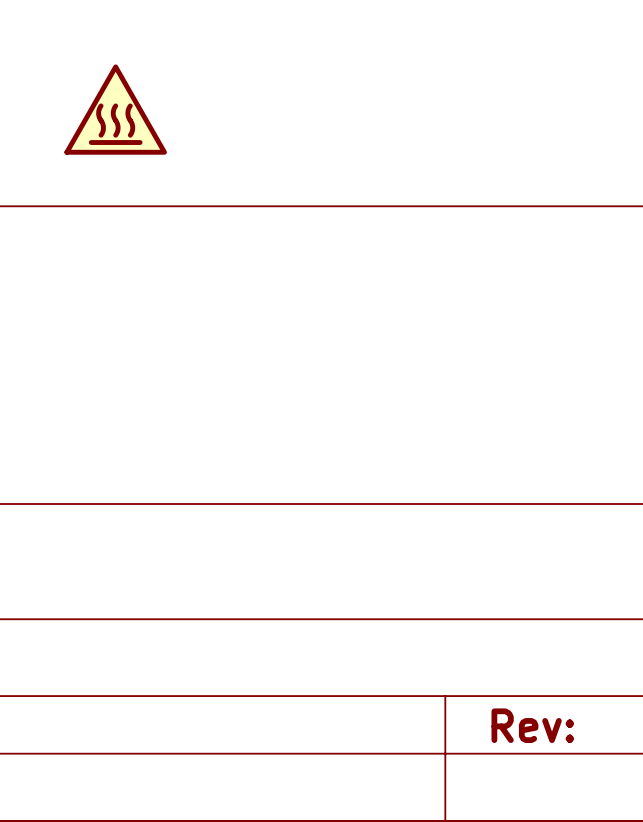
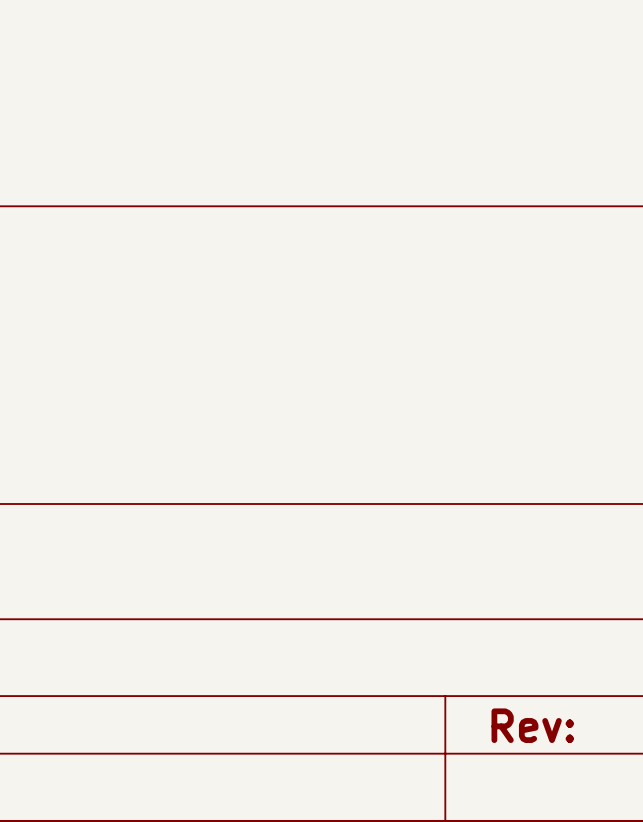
power symbol: (115, 109) -> none

